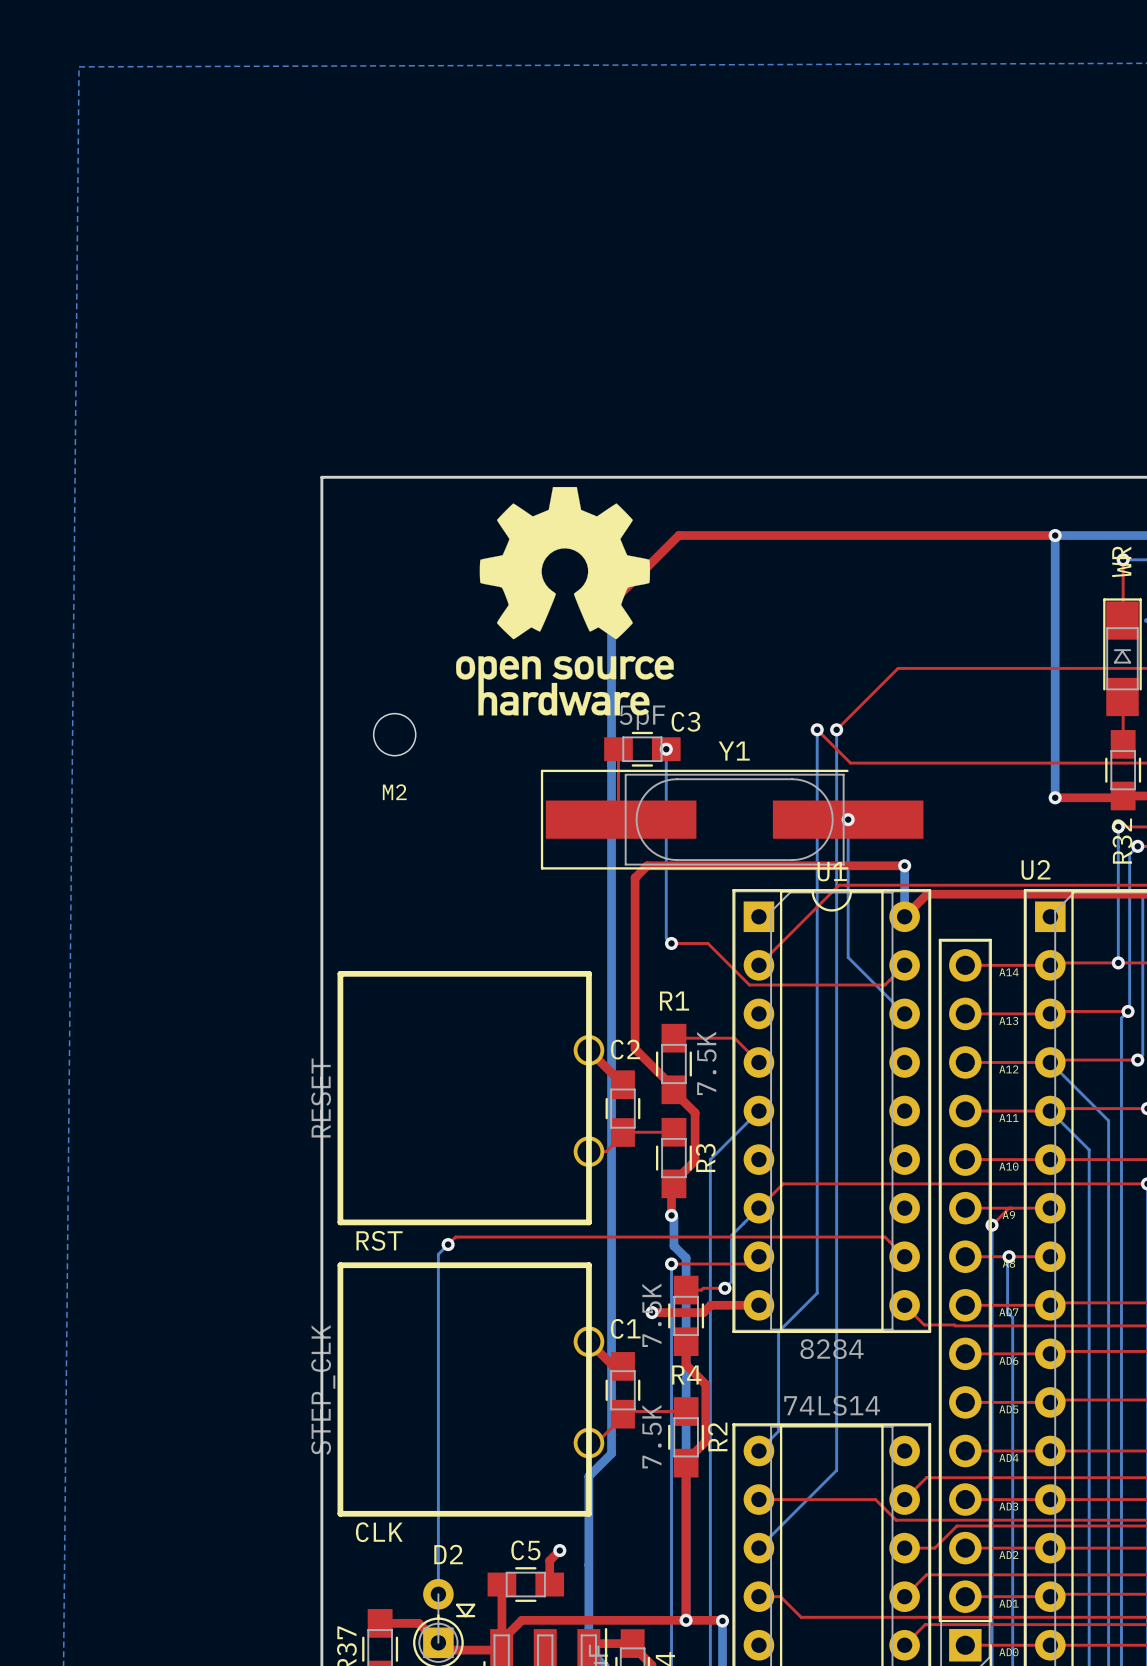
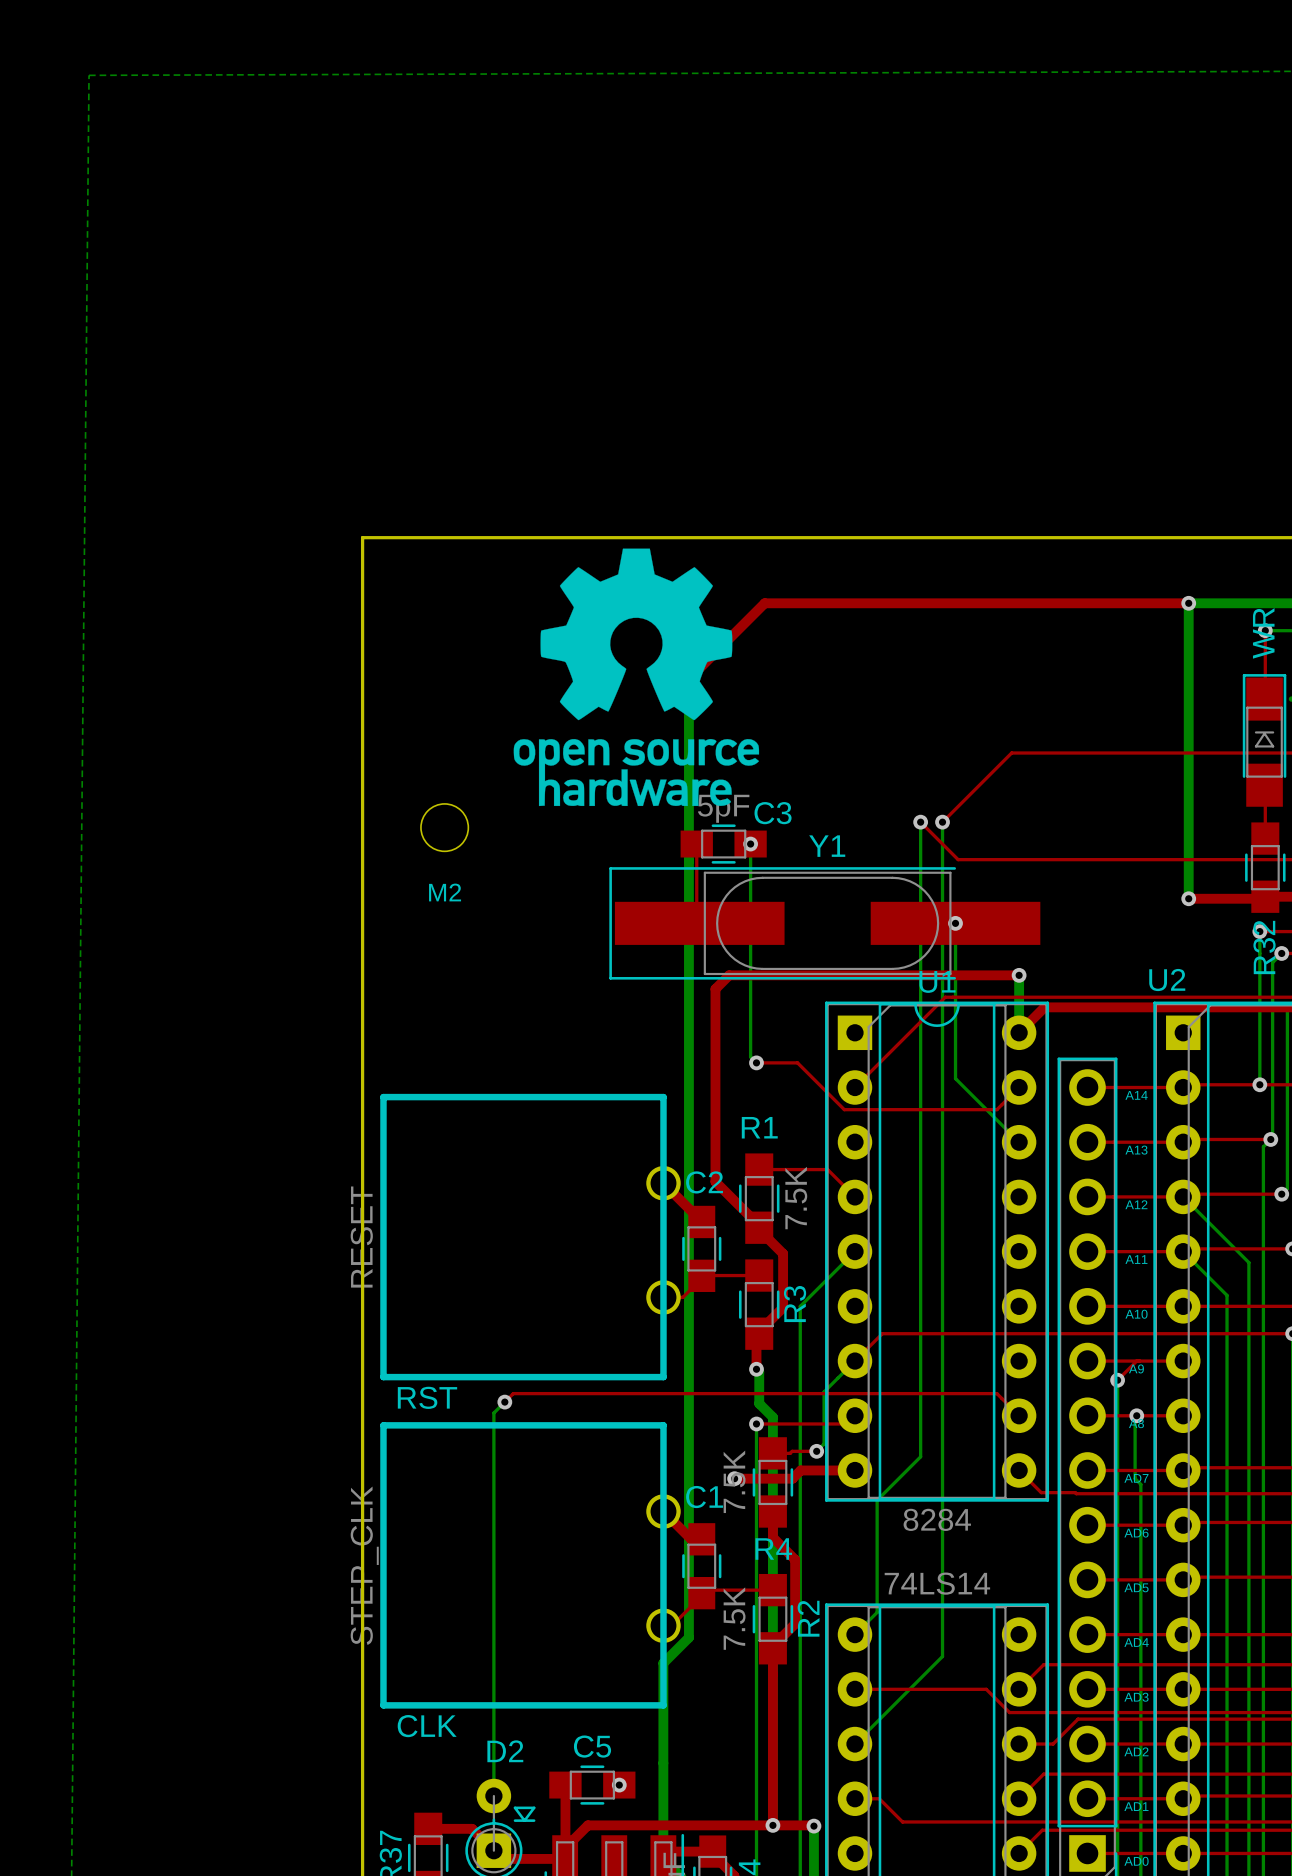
top track: (559, 1550) (549, 1560) (549, 1584) -> none
via position: (559, 1550) -> (619, 1785)

